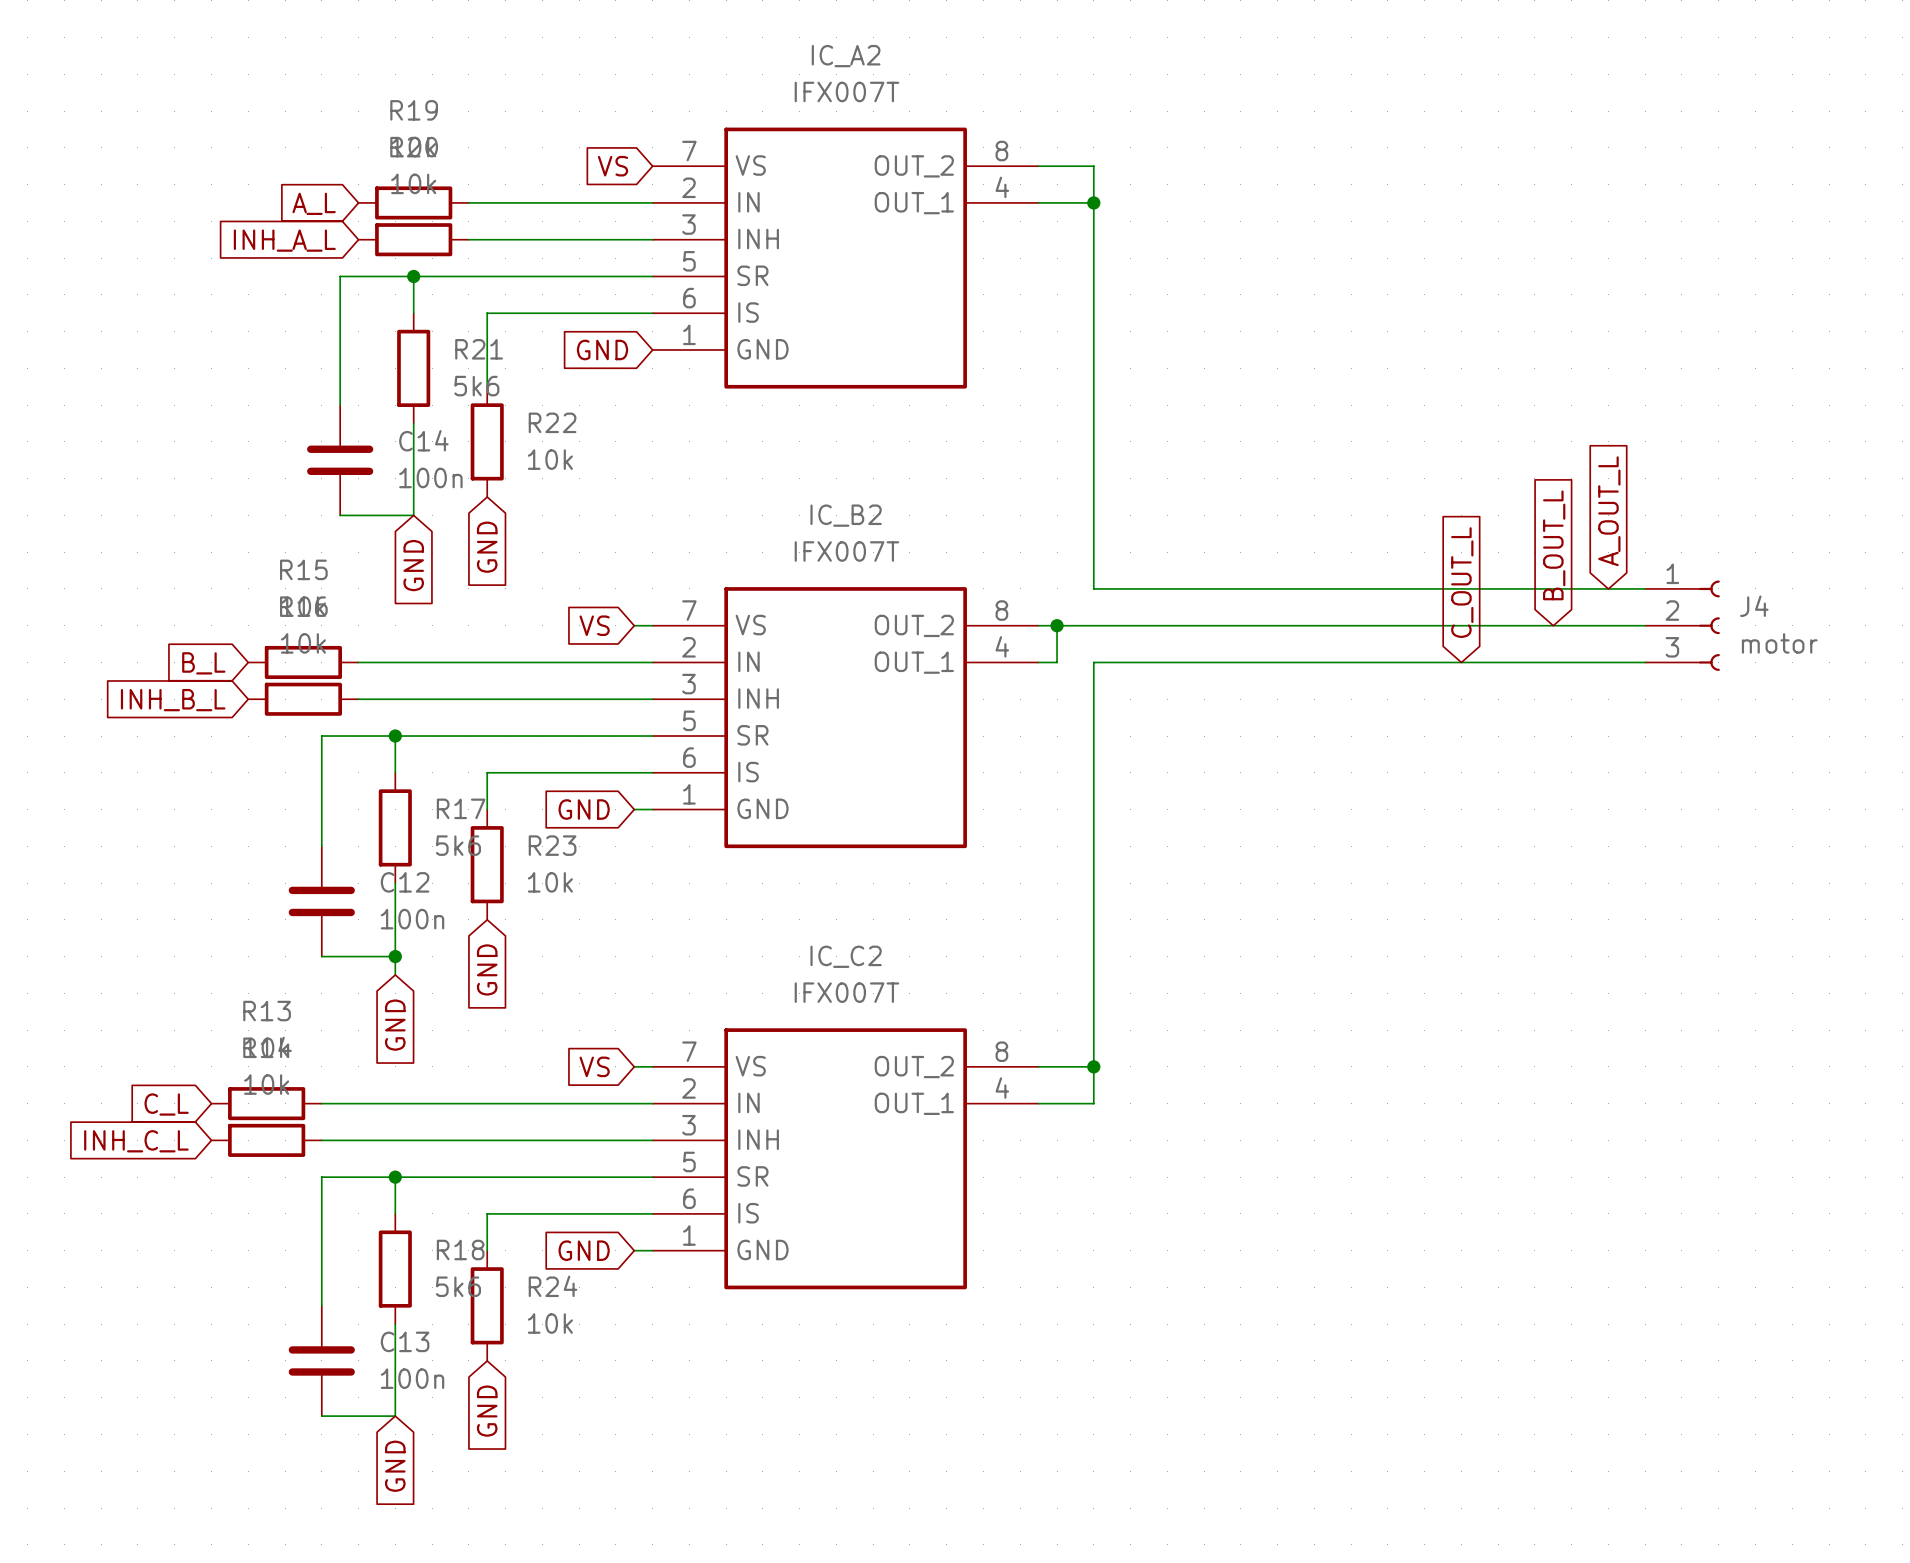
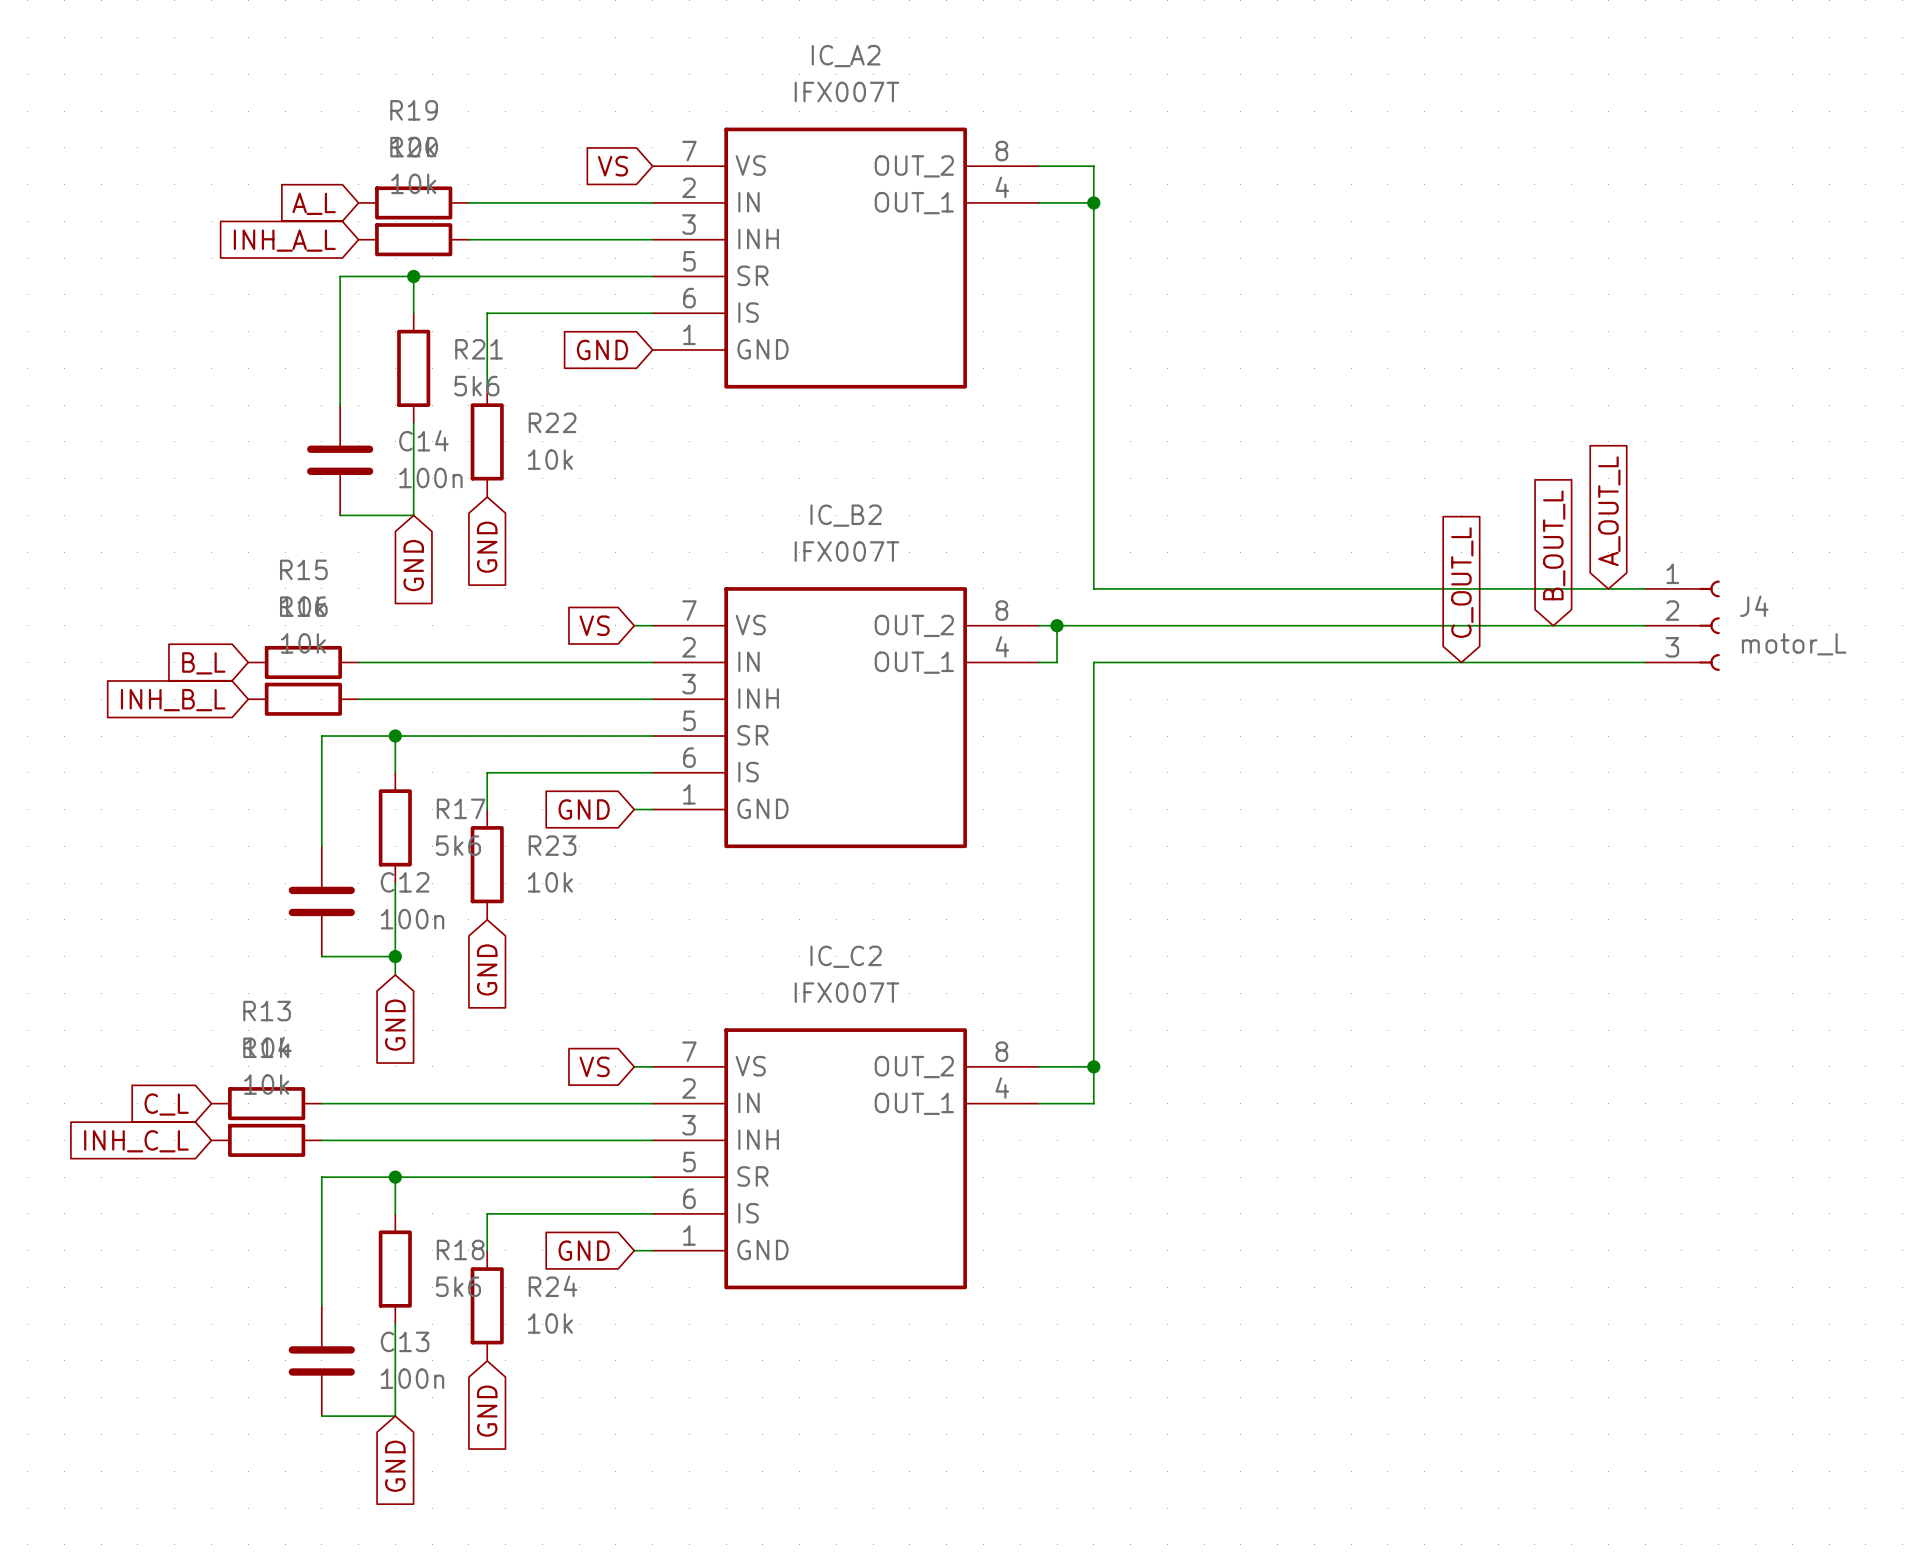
J4 value: motor (1779, 643) -> motor_L (1794, 644)

